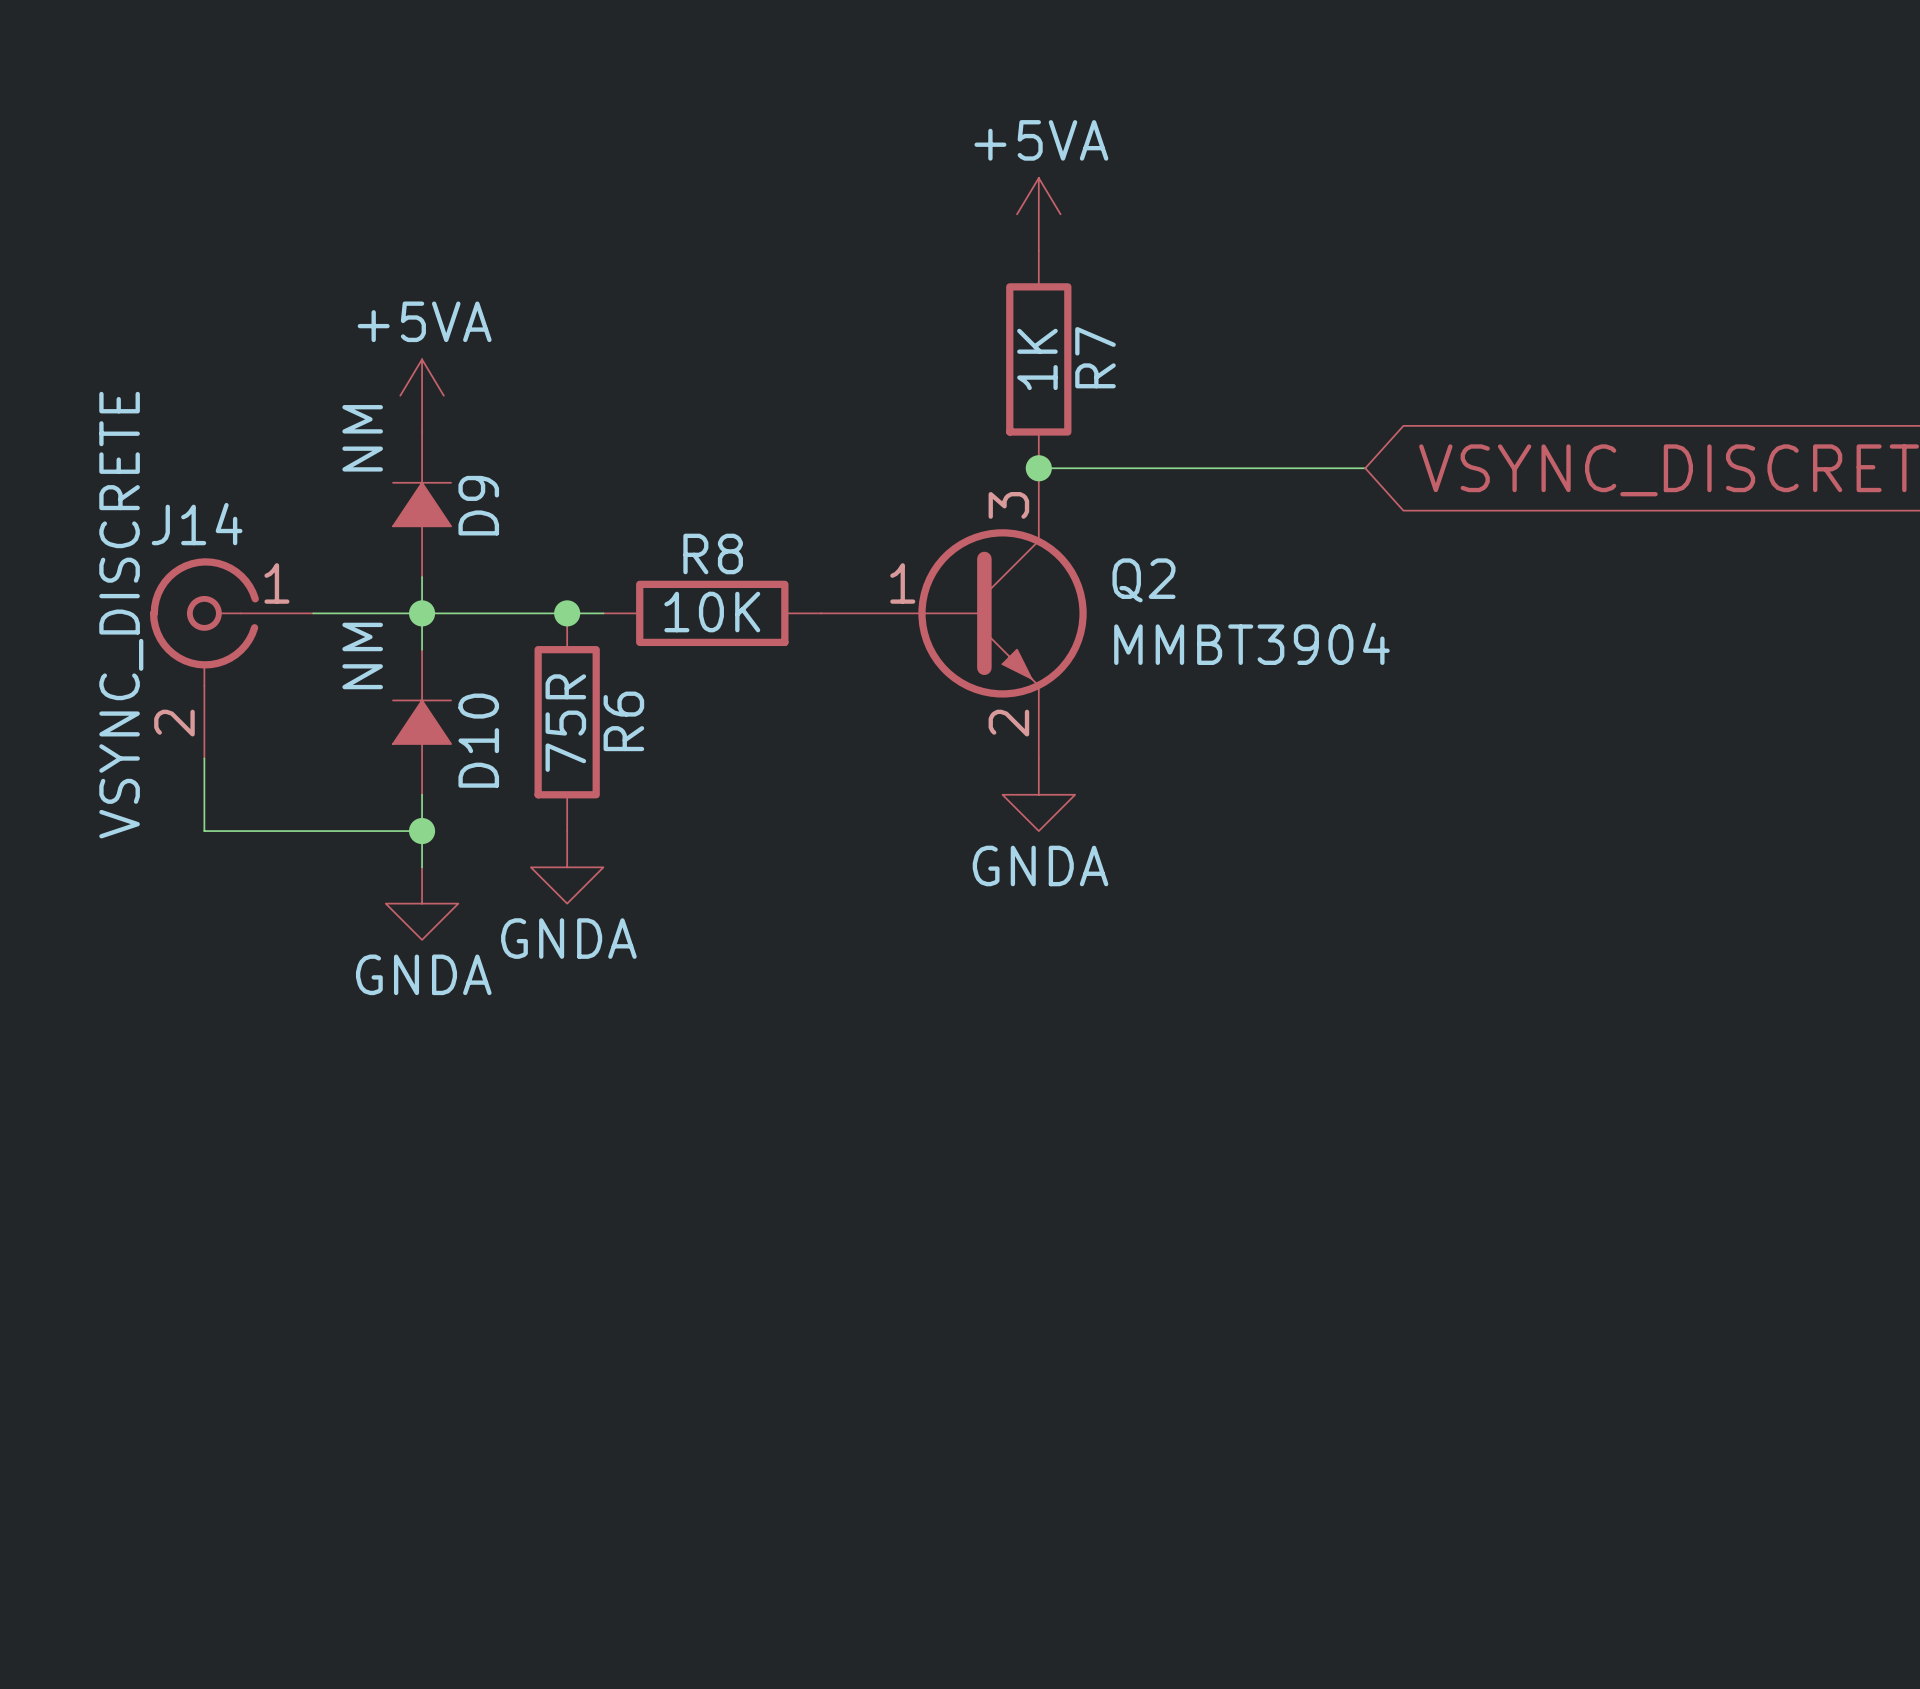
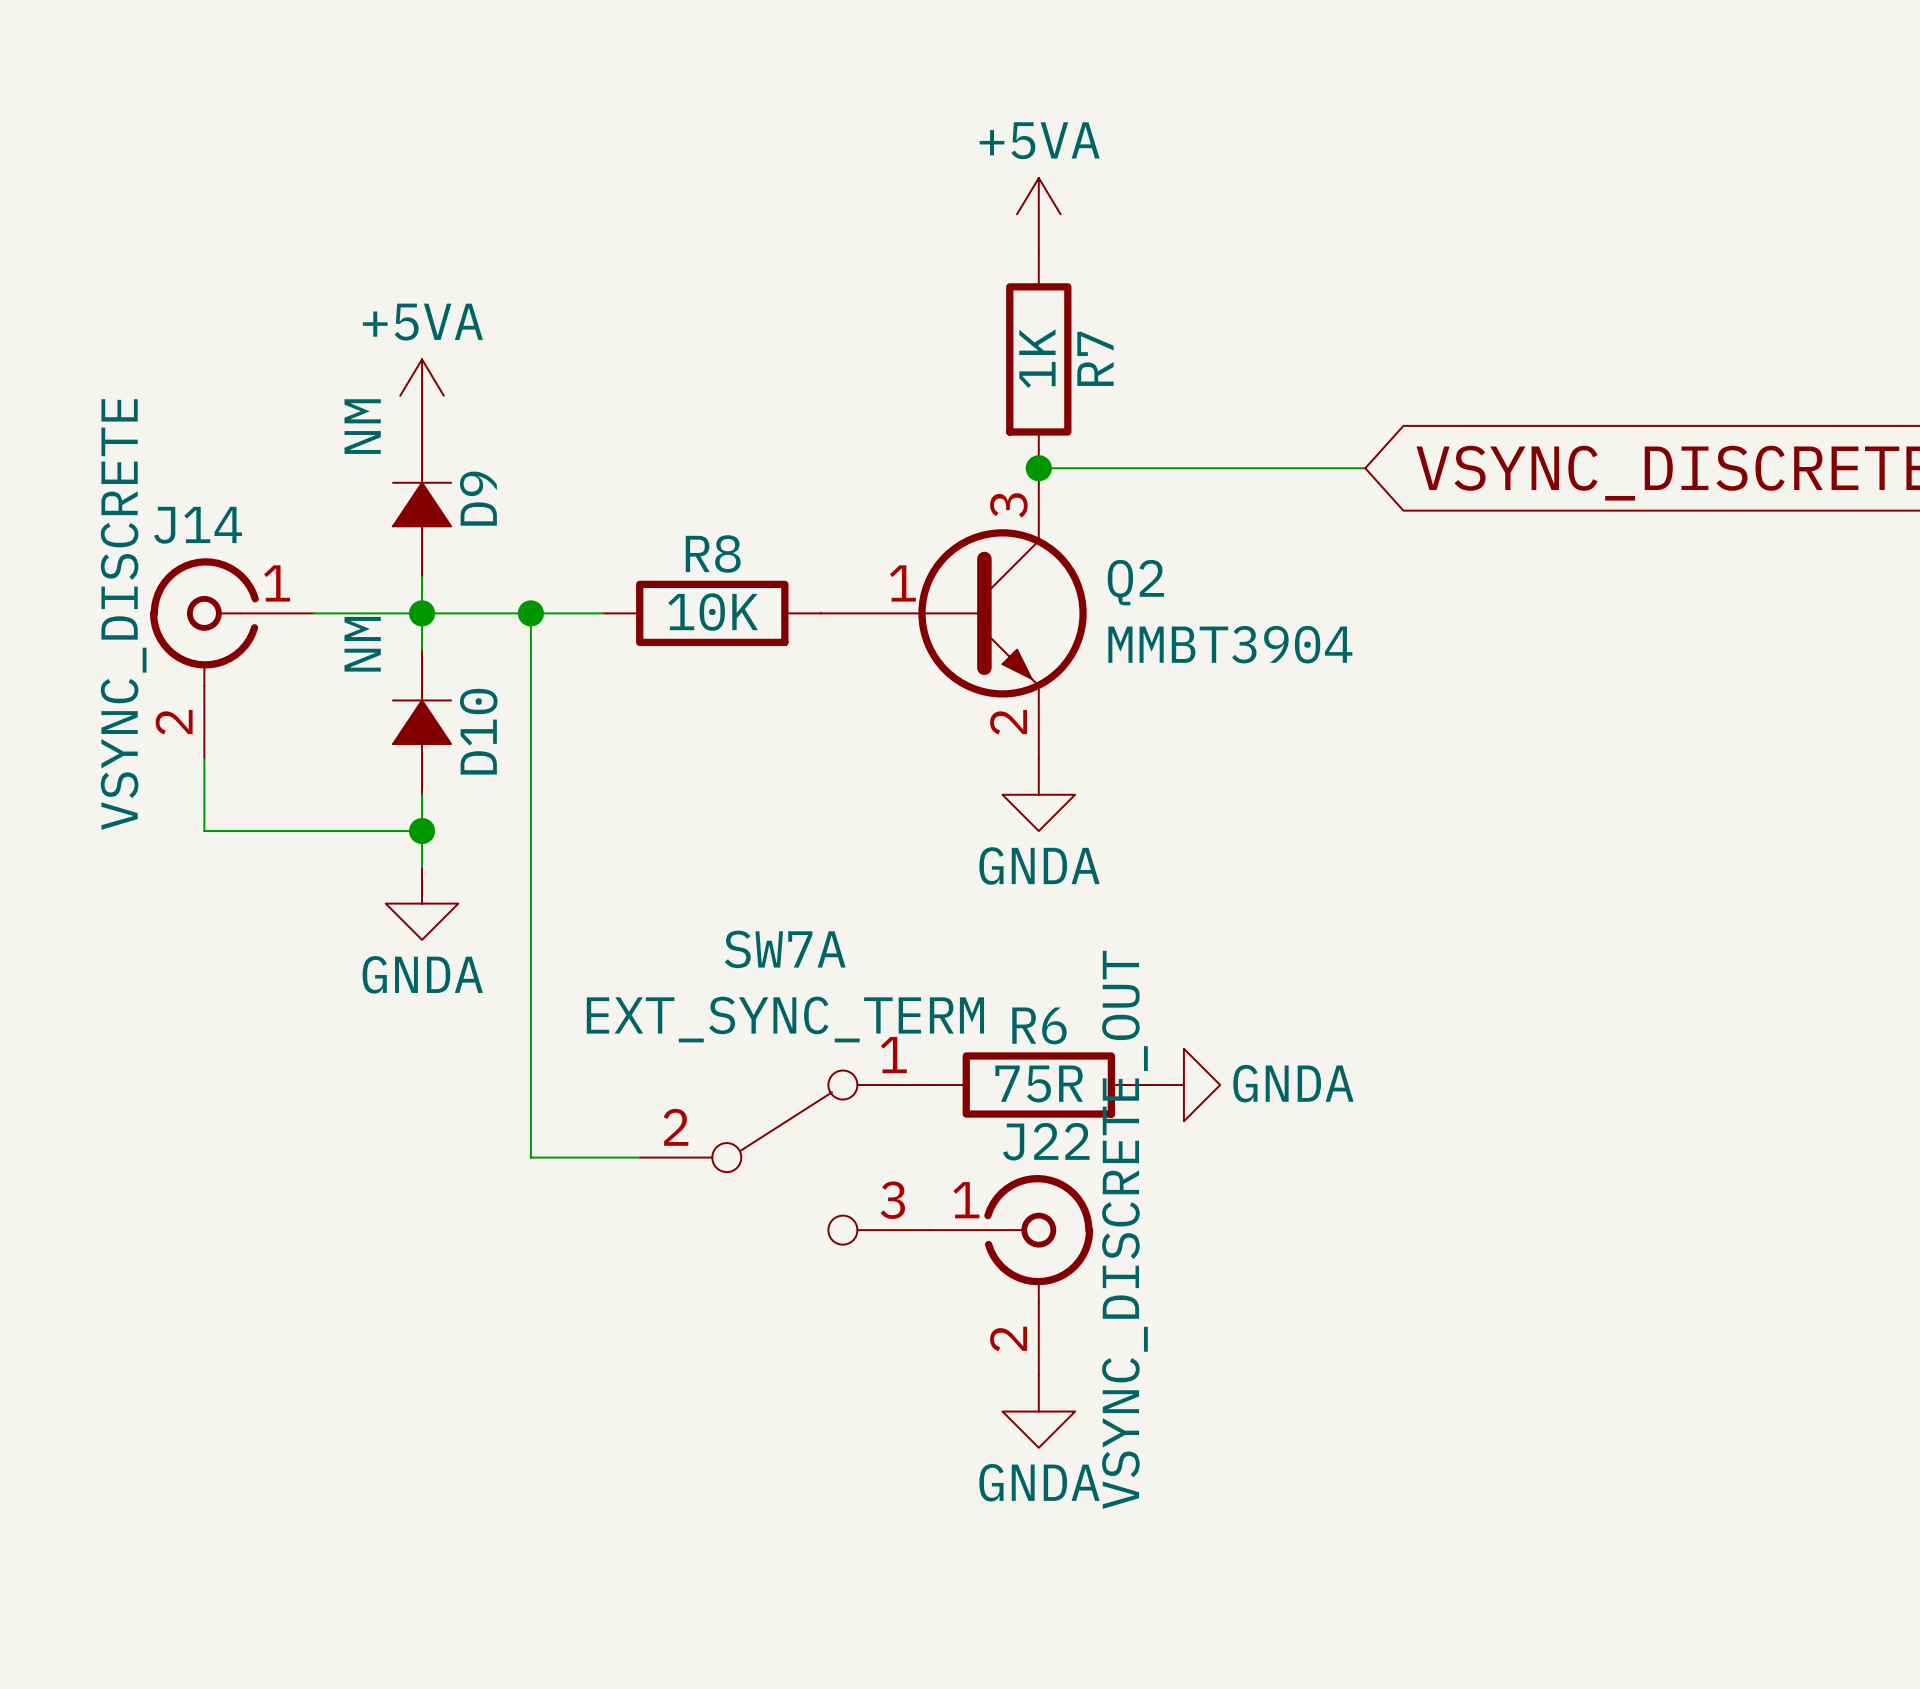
wire: none -> (530, 613) (530, 1157) (639, 1157)
junction position: (567, 613) -> (530, 613)
R6 name position: R6 (623, 721) -> R6 (1039, 1025)
R6 rotation: 0° (567, 722) -> 90° clockwise (1038, 1085)
R6 position: (567, 722) -> (1038, 1085)
power symbol: GNDA (567, 867) -> none
power symbol: none -> GNDA (1183, 1085)
SW7A: none -> EXT_SYNC_TERM (784, 1157)
J22: none -> VSYNC_DISCRETE_OUT (1011, 1275)
power symbol: none -> GNDA (1038, 1411)

